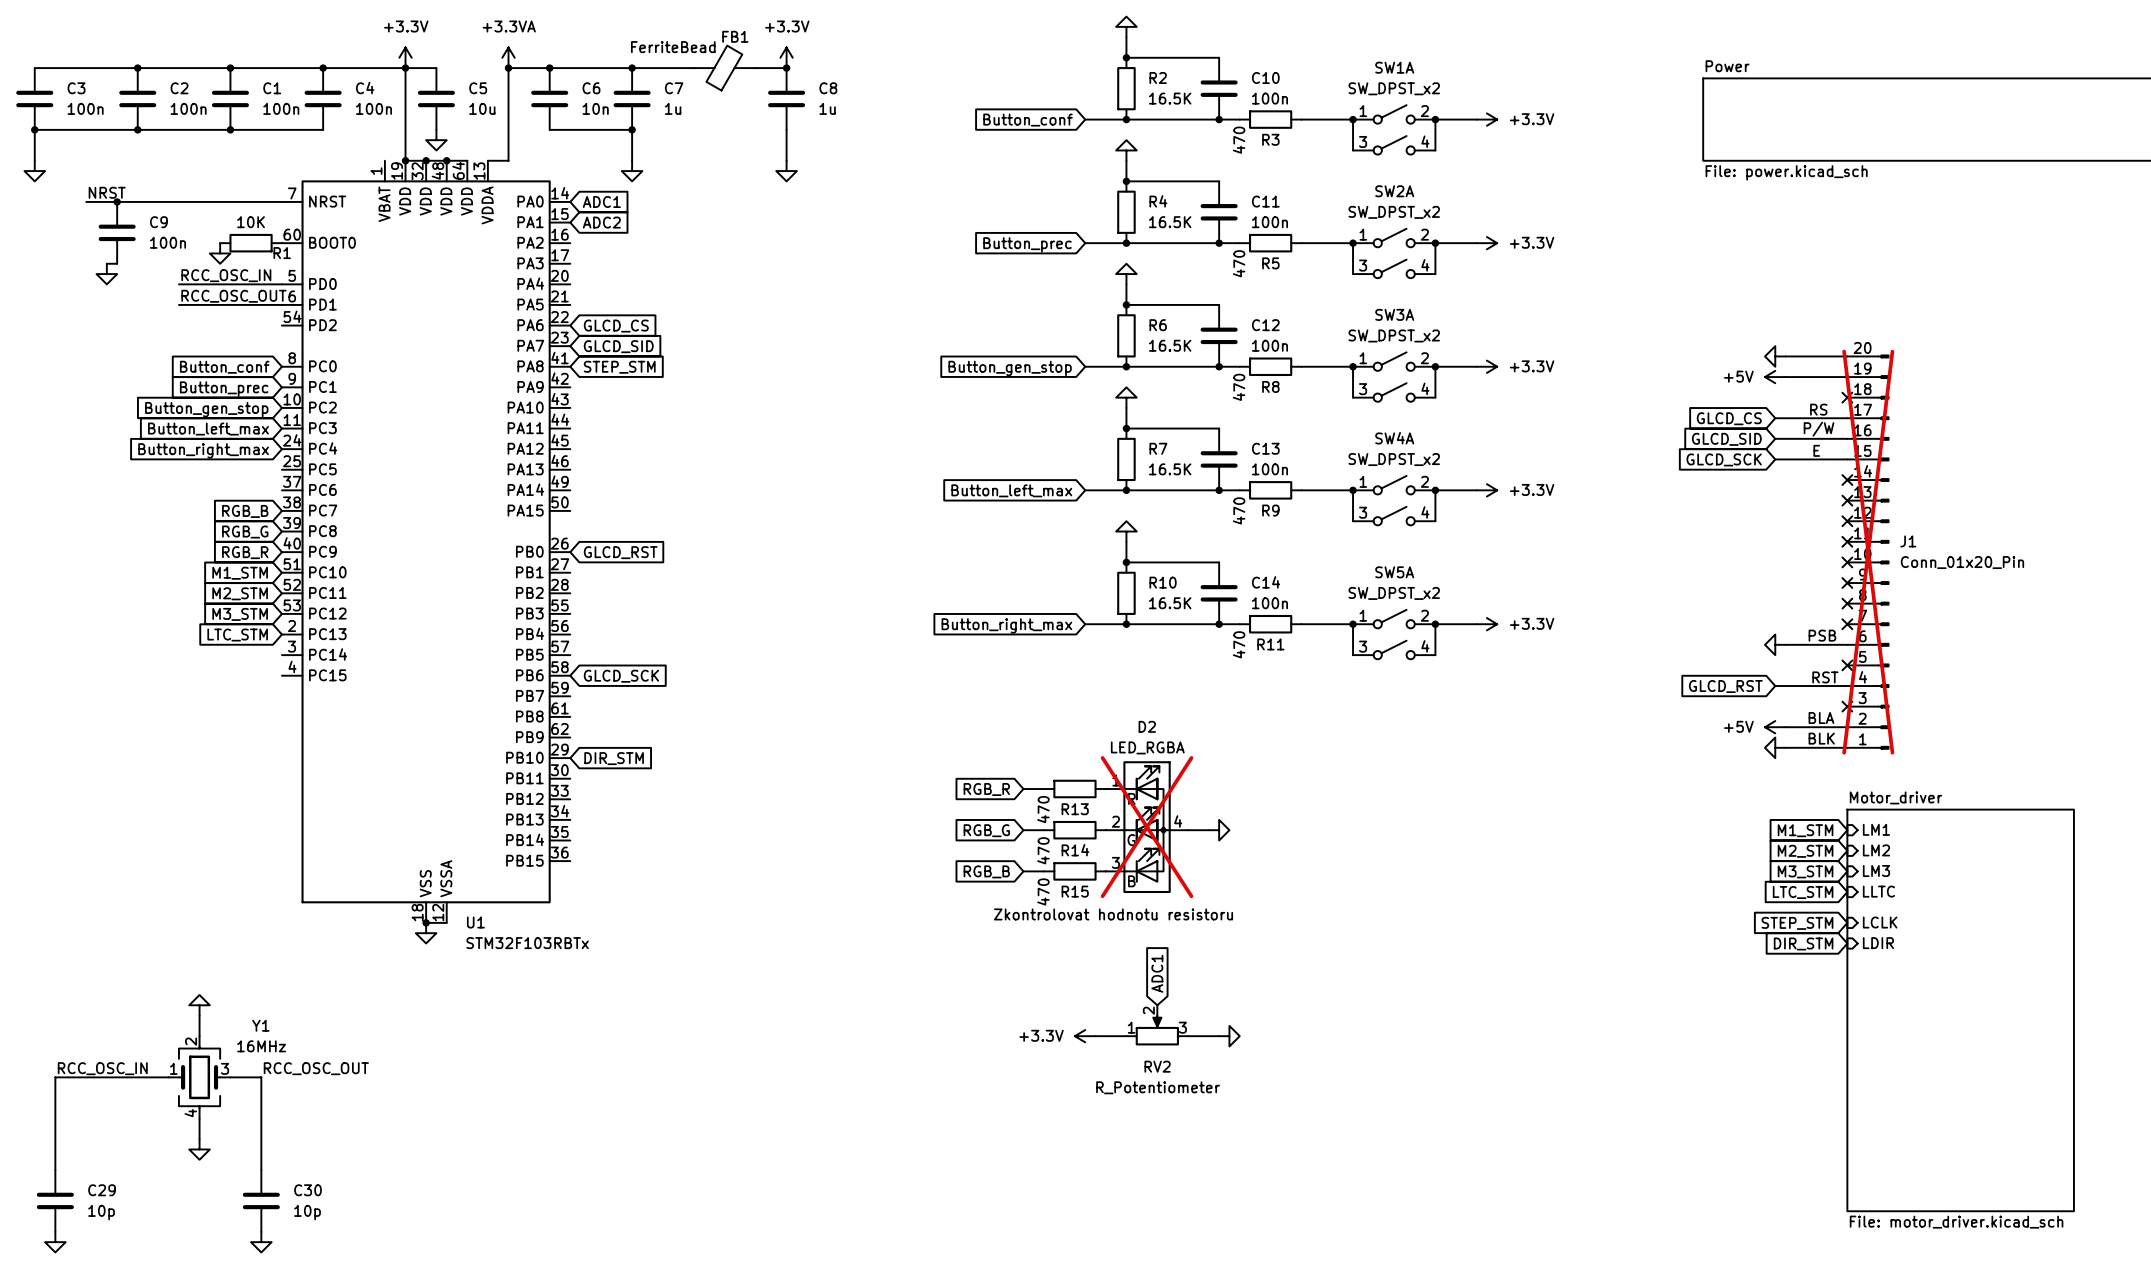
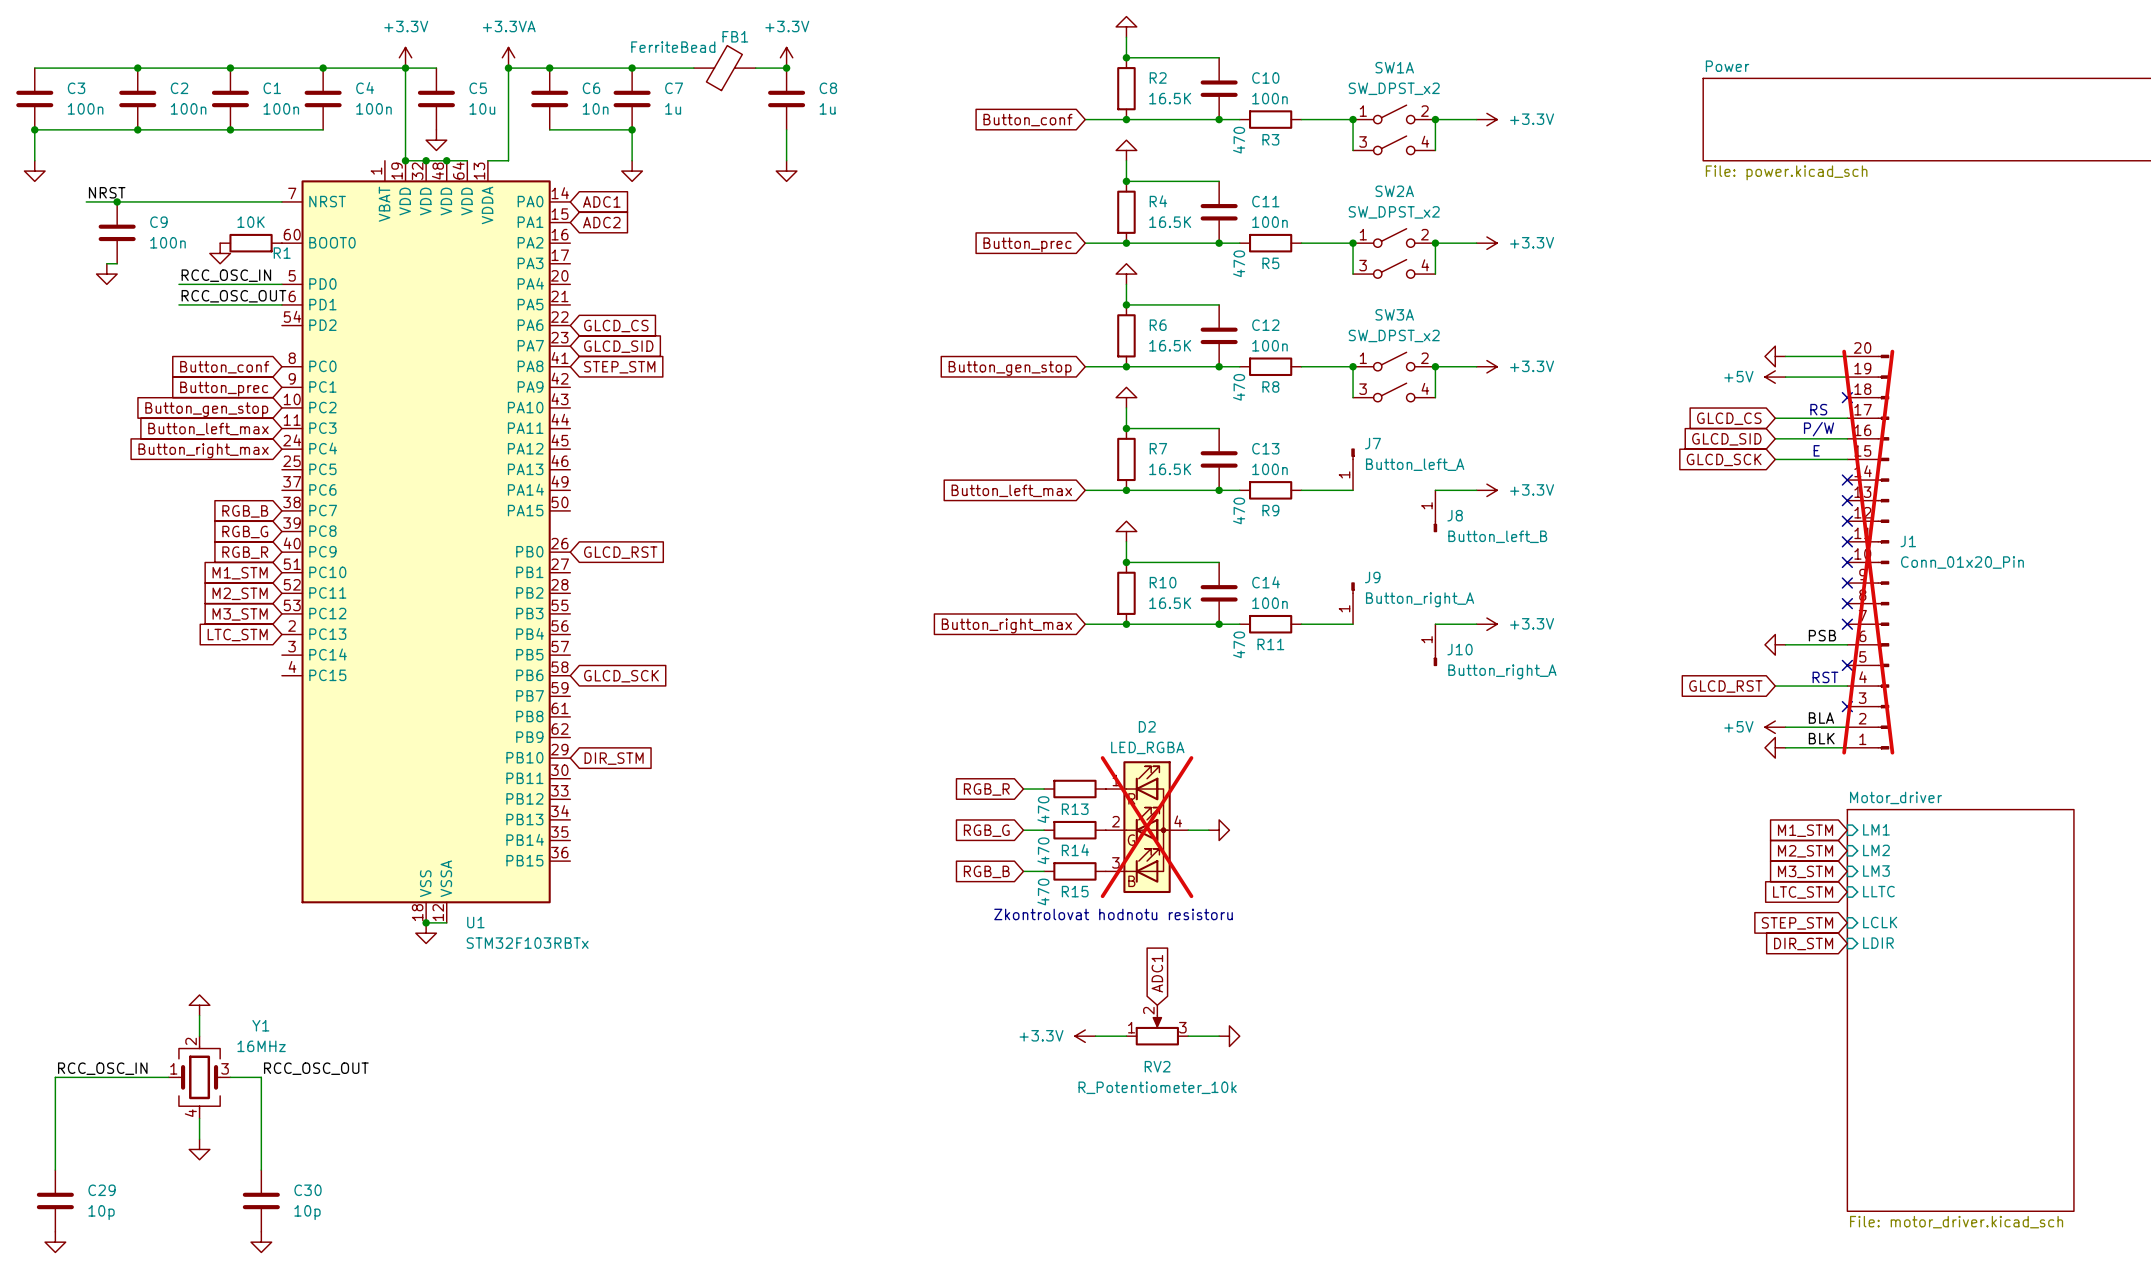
J7: none -> Button_left_A (1353, 469)
SW4A: SW_DPST_x2 (1394, 485) -> none
wire: (1353, 490) (1353, 521) -> none
junction: (1353, 490) -> none
junction: (1435, 490) -> none
J8: none -> Button_left_B (1435, 511)
part: (1394, 516) -> none
J9: none -> Button_right_A (1353, 603)
SW5A: SW_DPST_x2 (1394, 619) -> none
wire: (1353, 624) (1353, 655) -> none
junction: (1353, 624) -> none
junction: (1435, 624) -> none
J10: none -> Button_right_A (1435, 645)
part: (1394, 649) -> none
RV2 value: R_Potentiometer (1158, 1087) -> R_Potentiometer_10k (1157, 1087)

